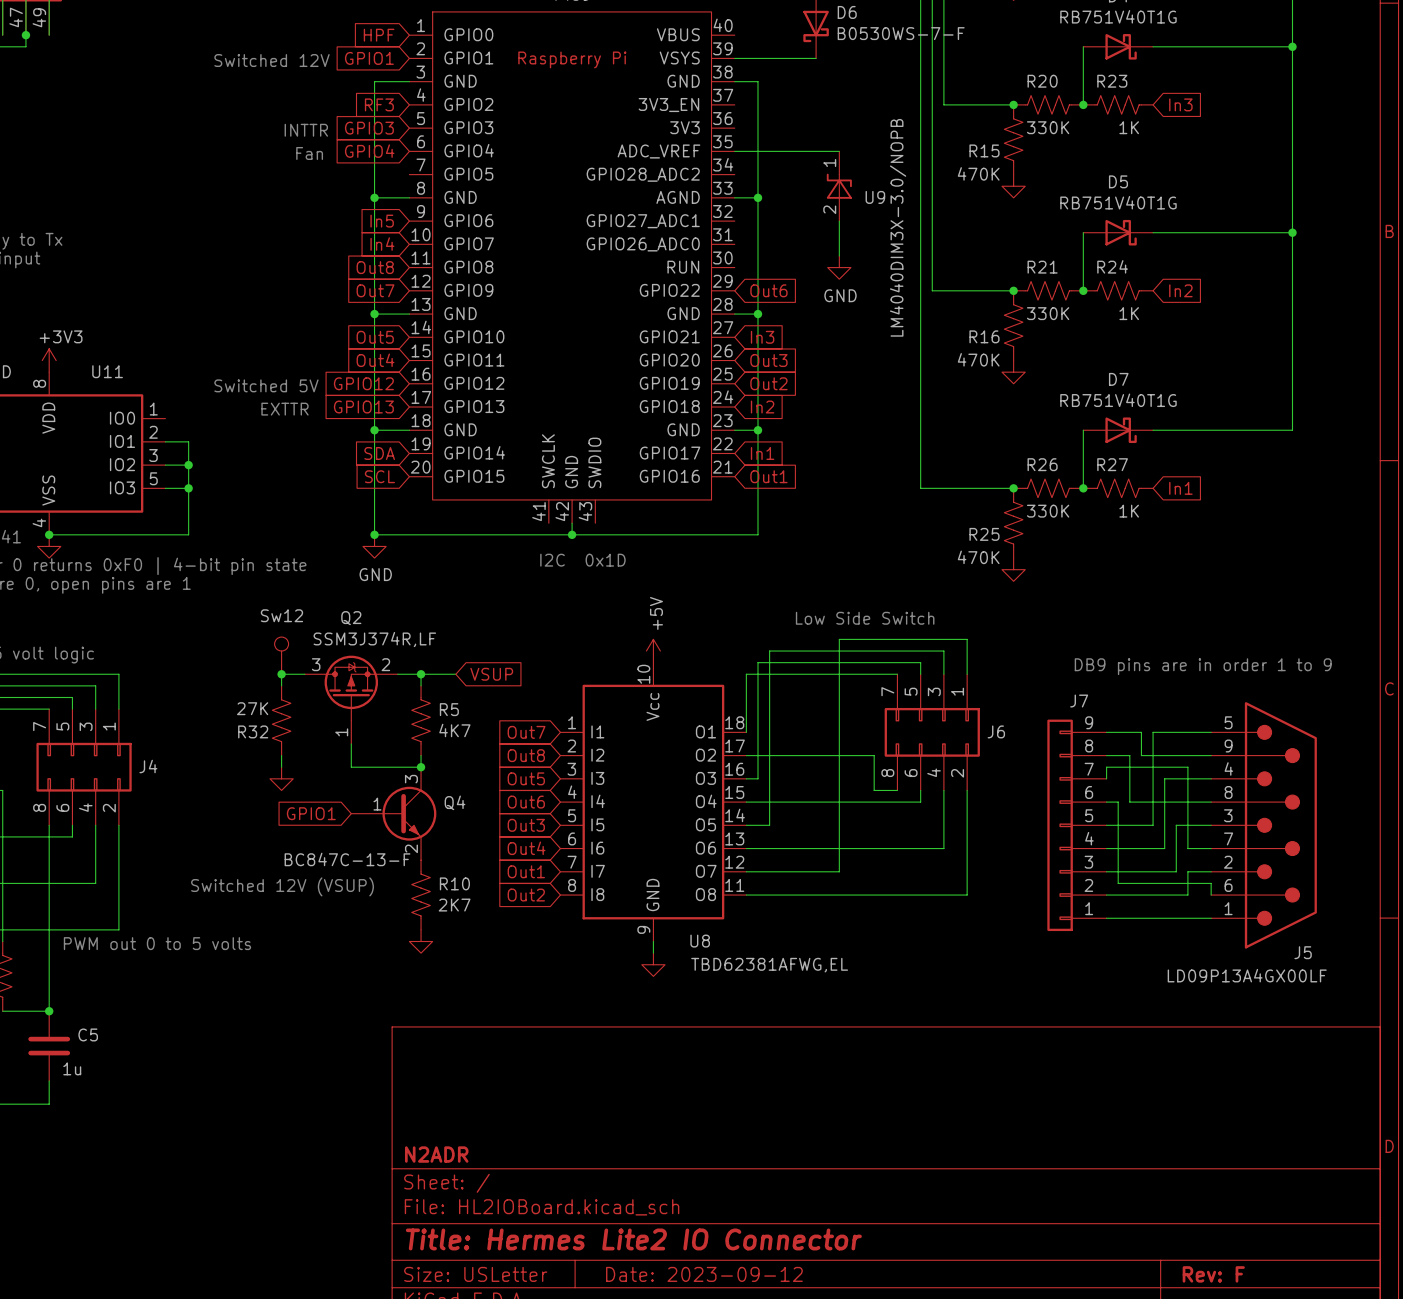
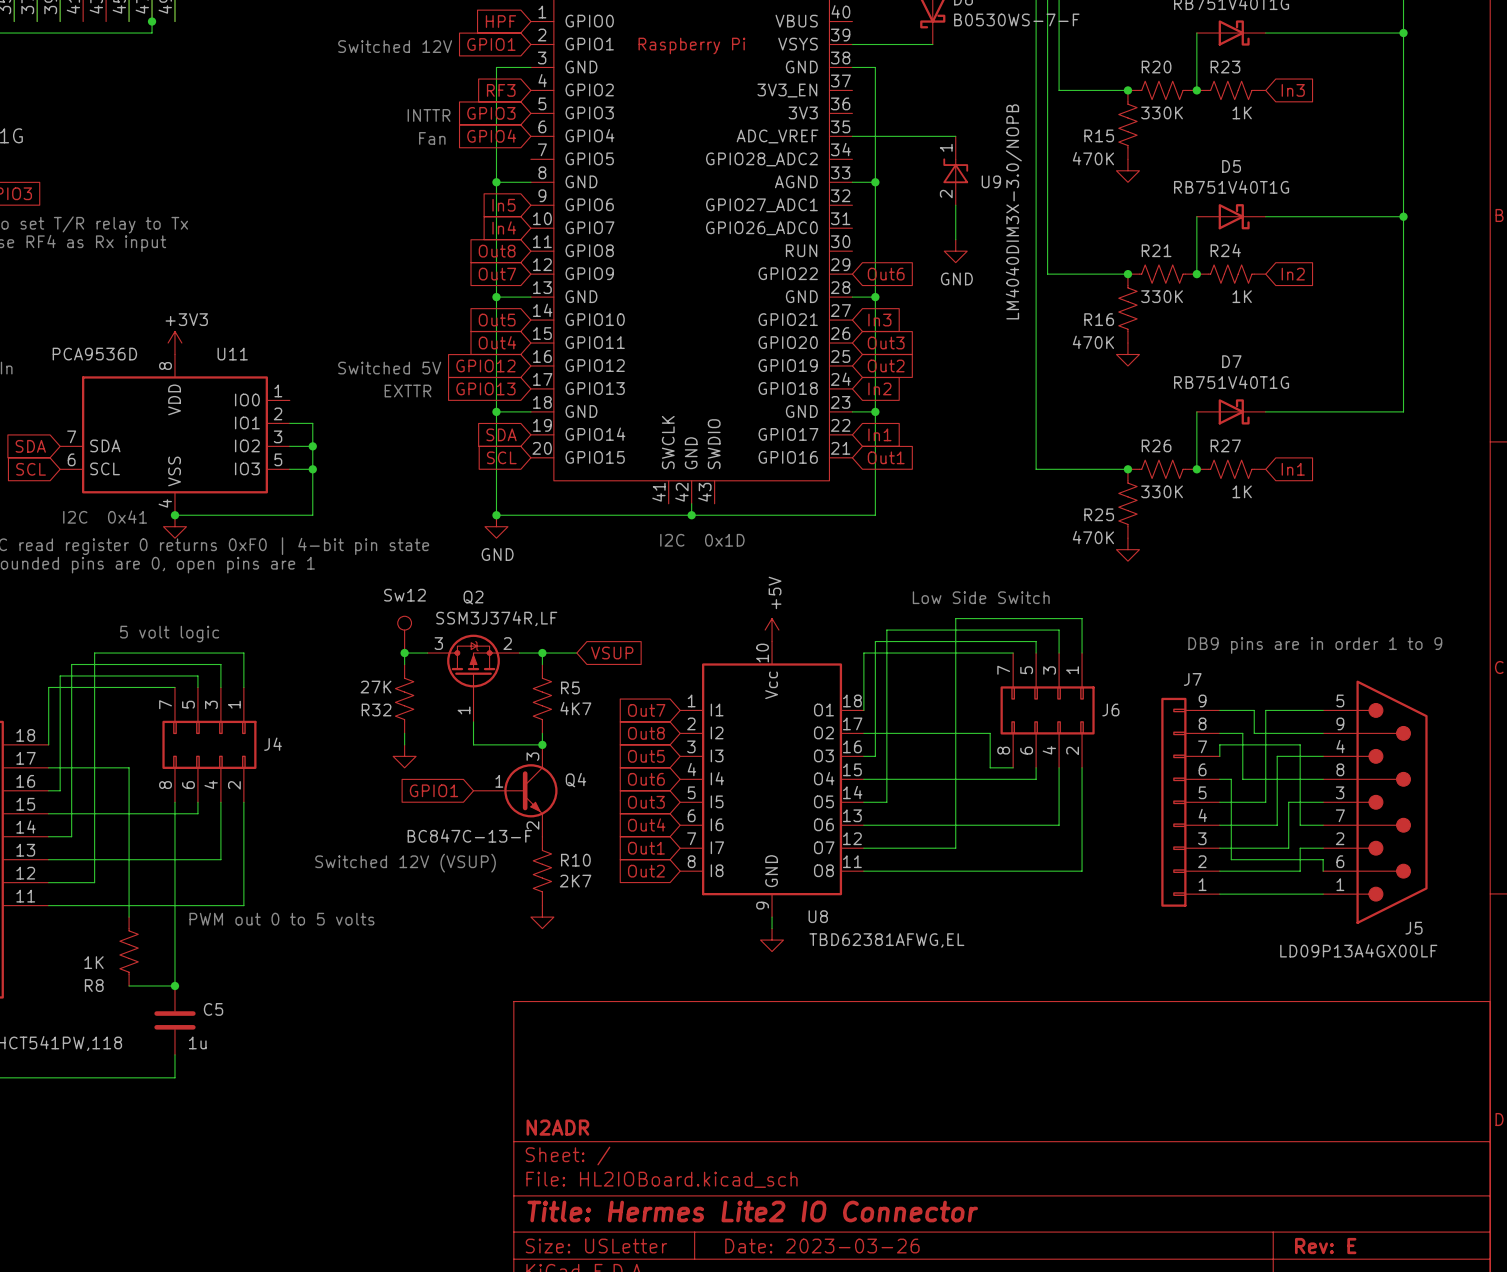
title block: Date: 2023-09-12 (704, 1274) -> Date: 2023-03-26 (822, 1246)
title block: Rev: F (1213, 1274) -> Rev: E (1325, 1246)

